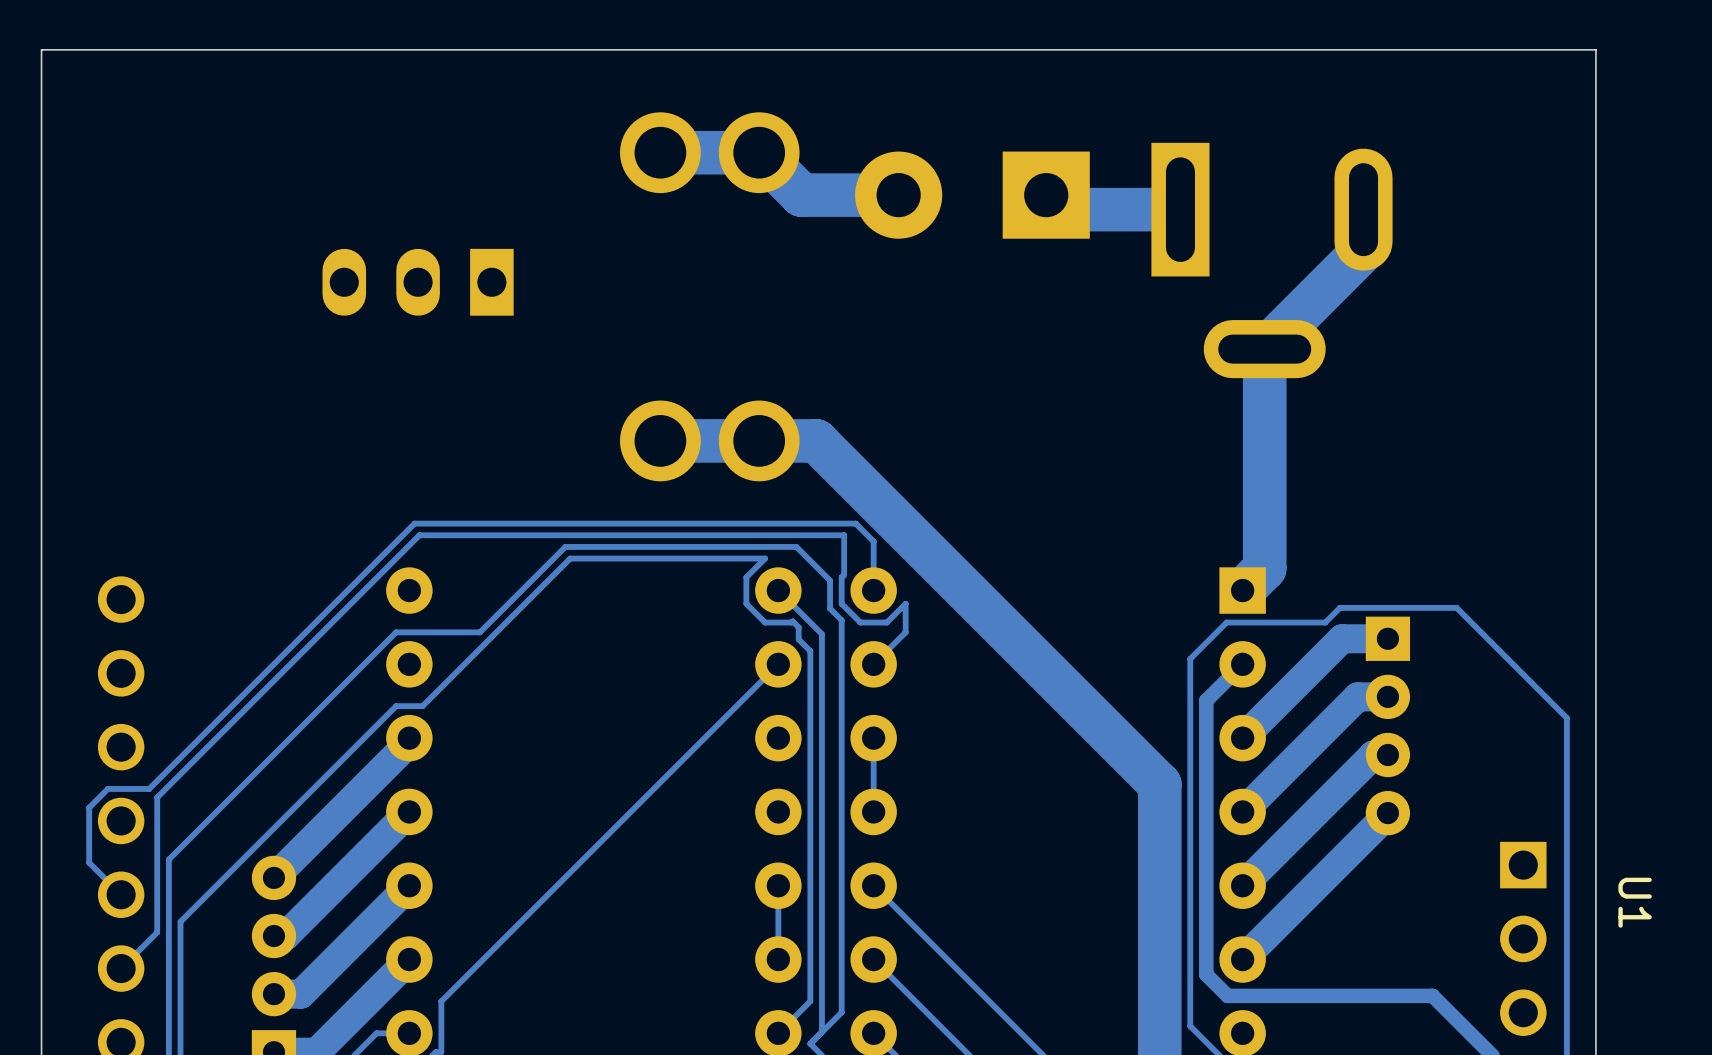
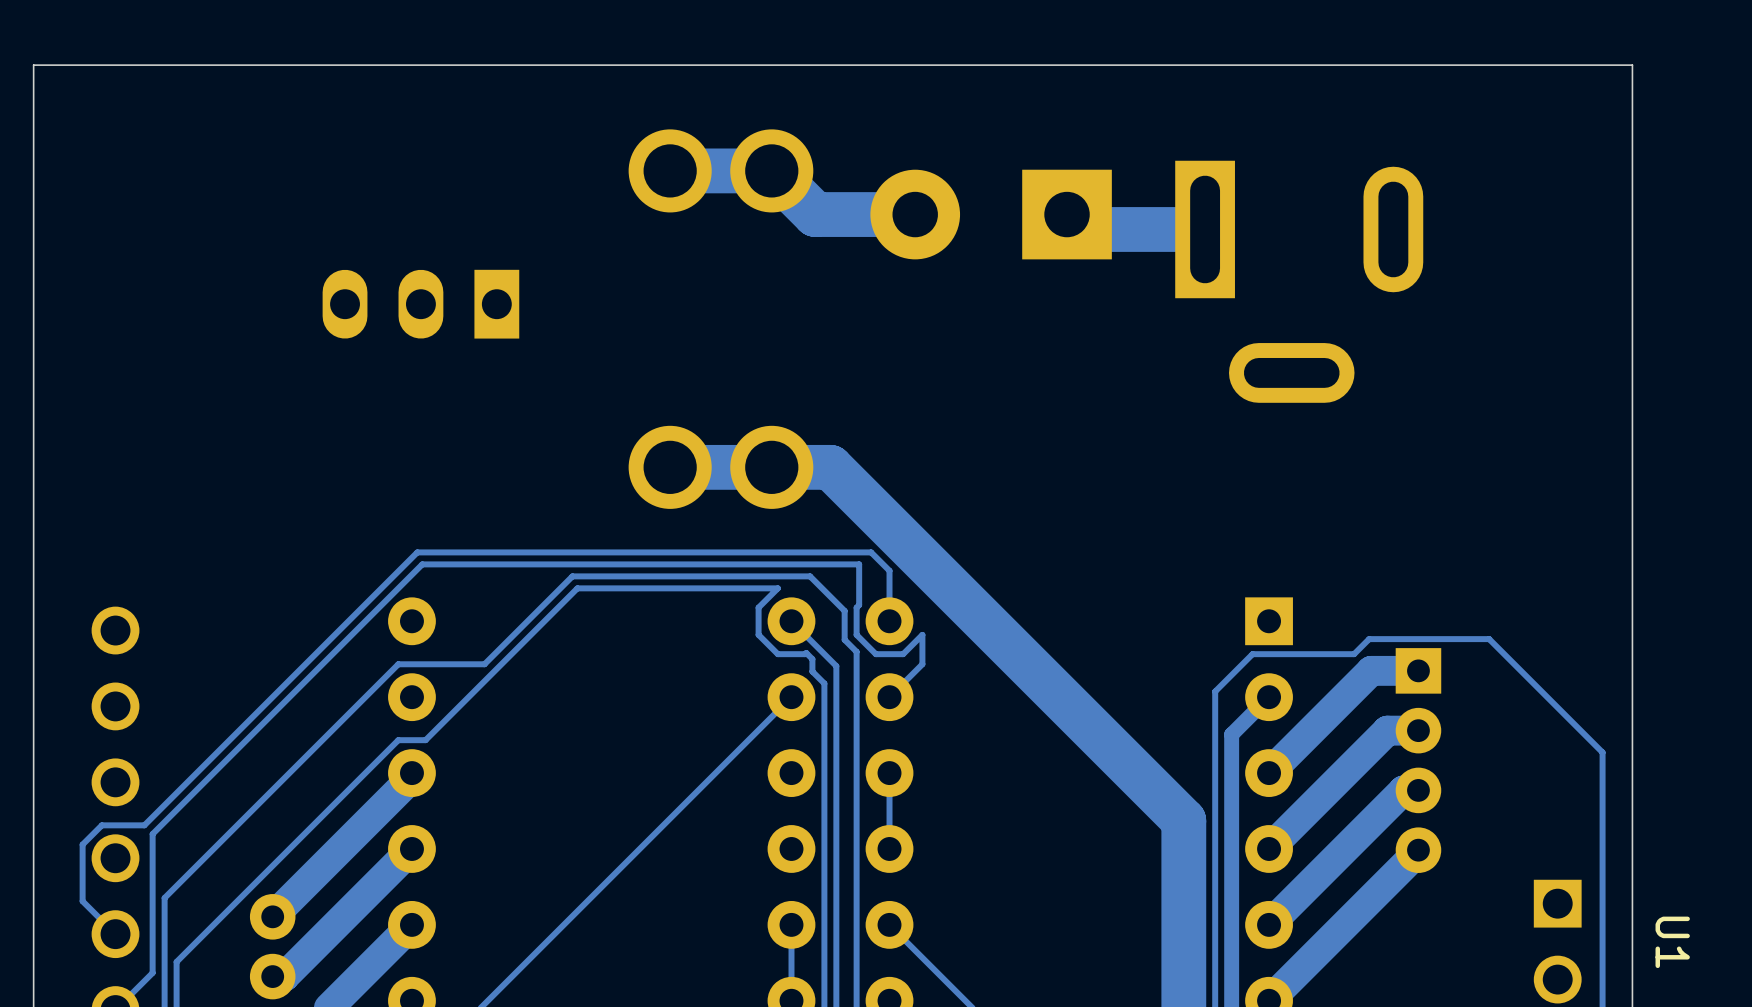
track: (1363, 209) (1363, 250) (1264, 349) (1264, 568) (1242, 590) -> none

